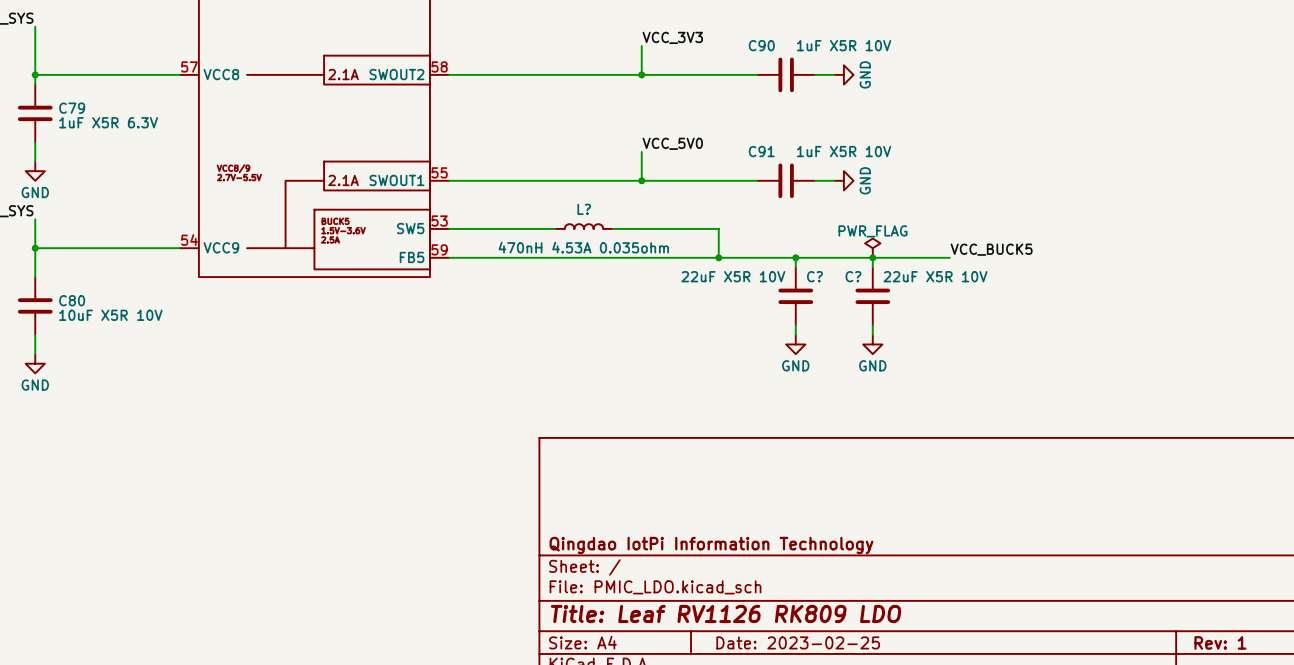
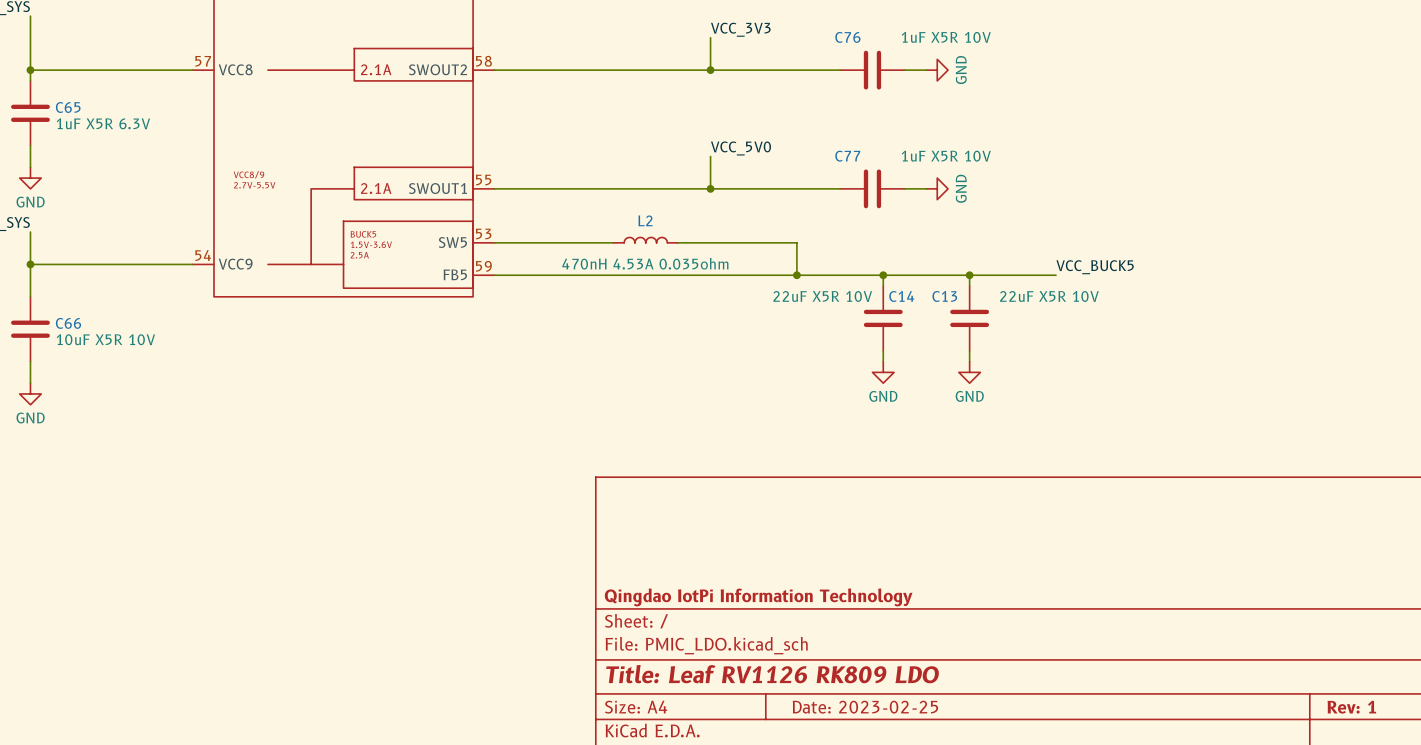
C90 name: C90 (761, 45) -> C76 (847, 37)
C79 name: C79 (72, 108) -> C65 (68, 107)
C91 name: C91 (761, 151) -> C77 (847, 156)
L? name: L? (584, 209) -> L2 (645, 220)
power symbol: PWR_FLAG (872, 248) -> none
C? name: C? (814, 276) -> C14 (901, 296)
C? name: C? (853, 276) -> C13 (944, 296)
C80 name: C80 (72, 300) -> C66 (68, 323)

